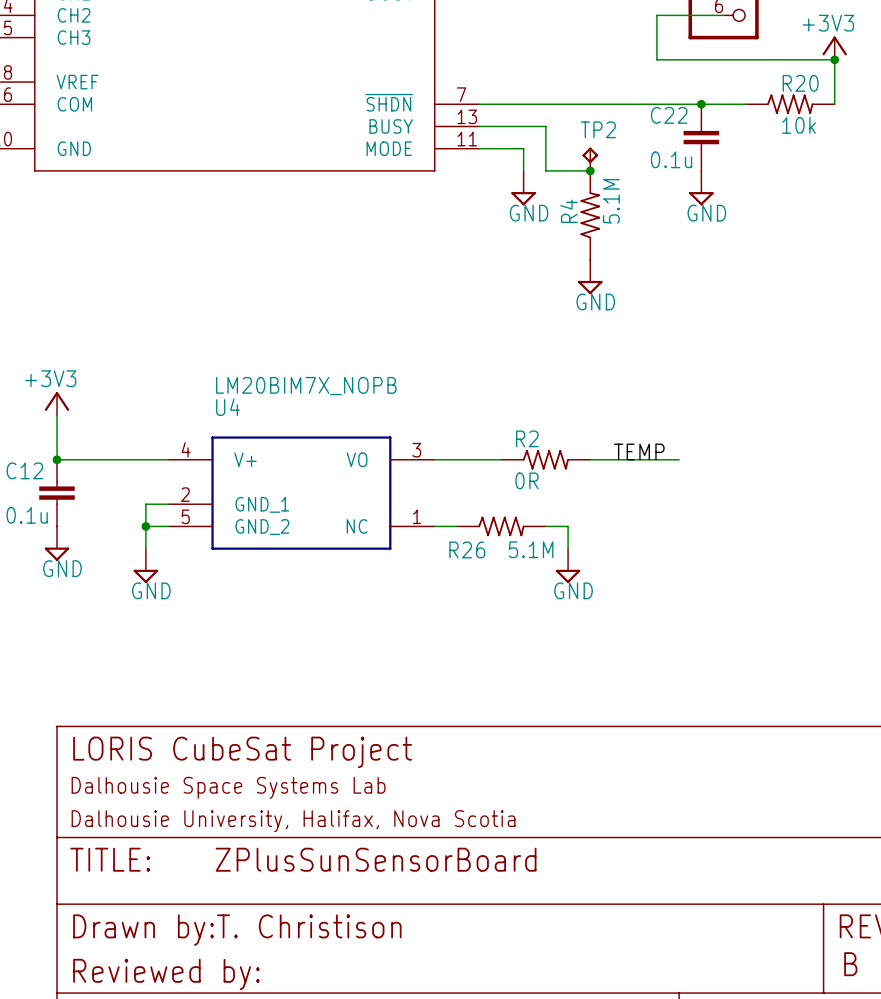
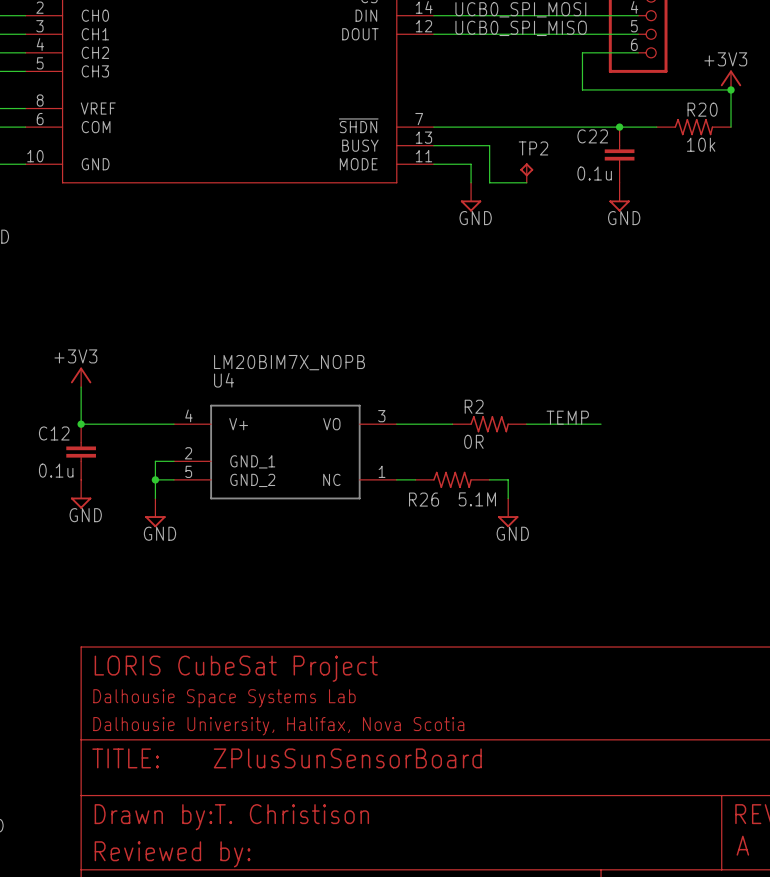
junction: (590, 170) -> none
R4: 5.1M (590, 215) -> none
power symbol: GND (590, 277) -> none
text: B (850, 964) -> A (742, 845)

